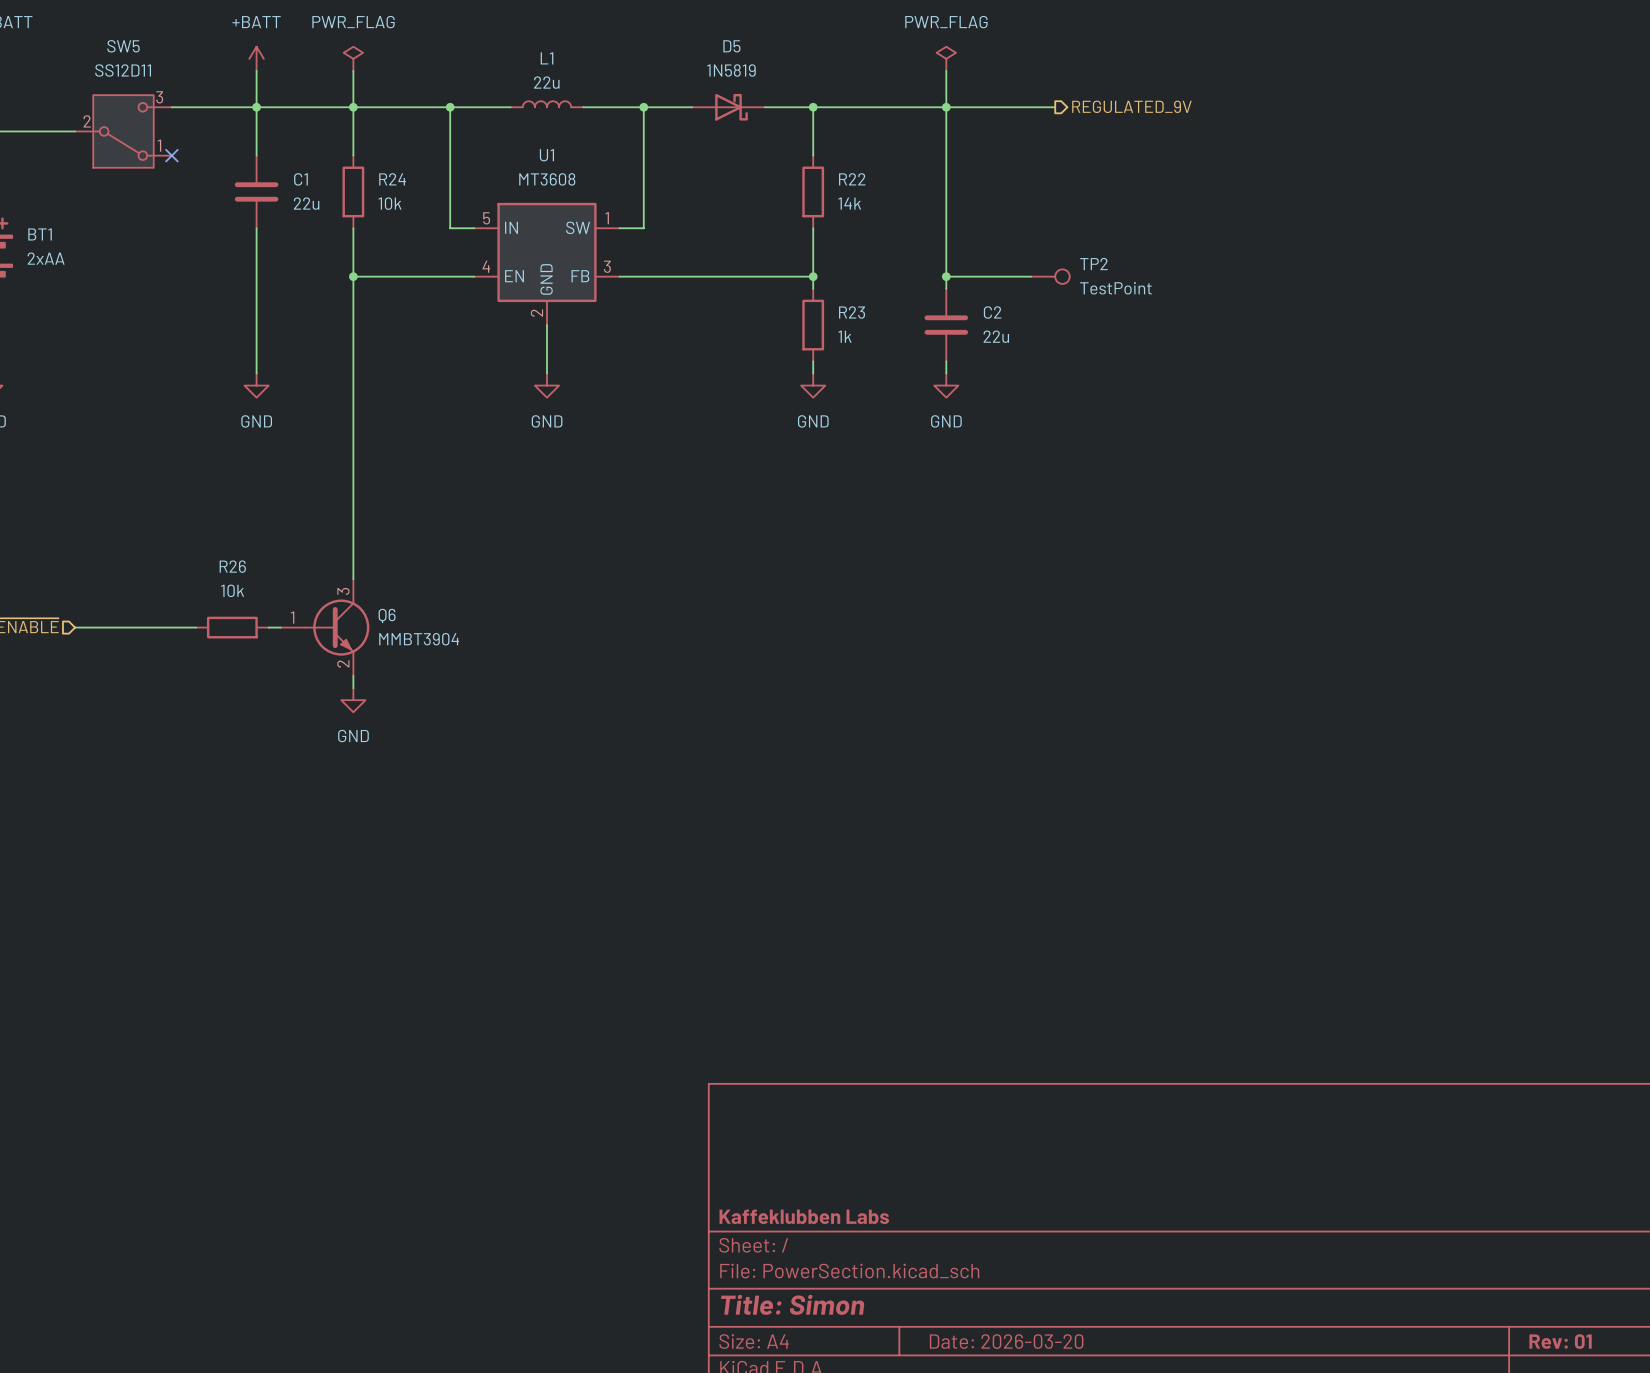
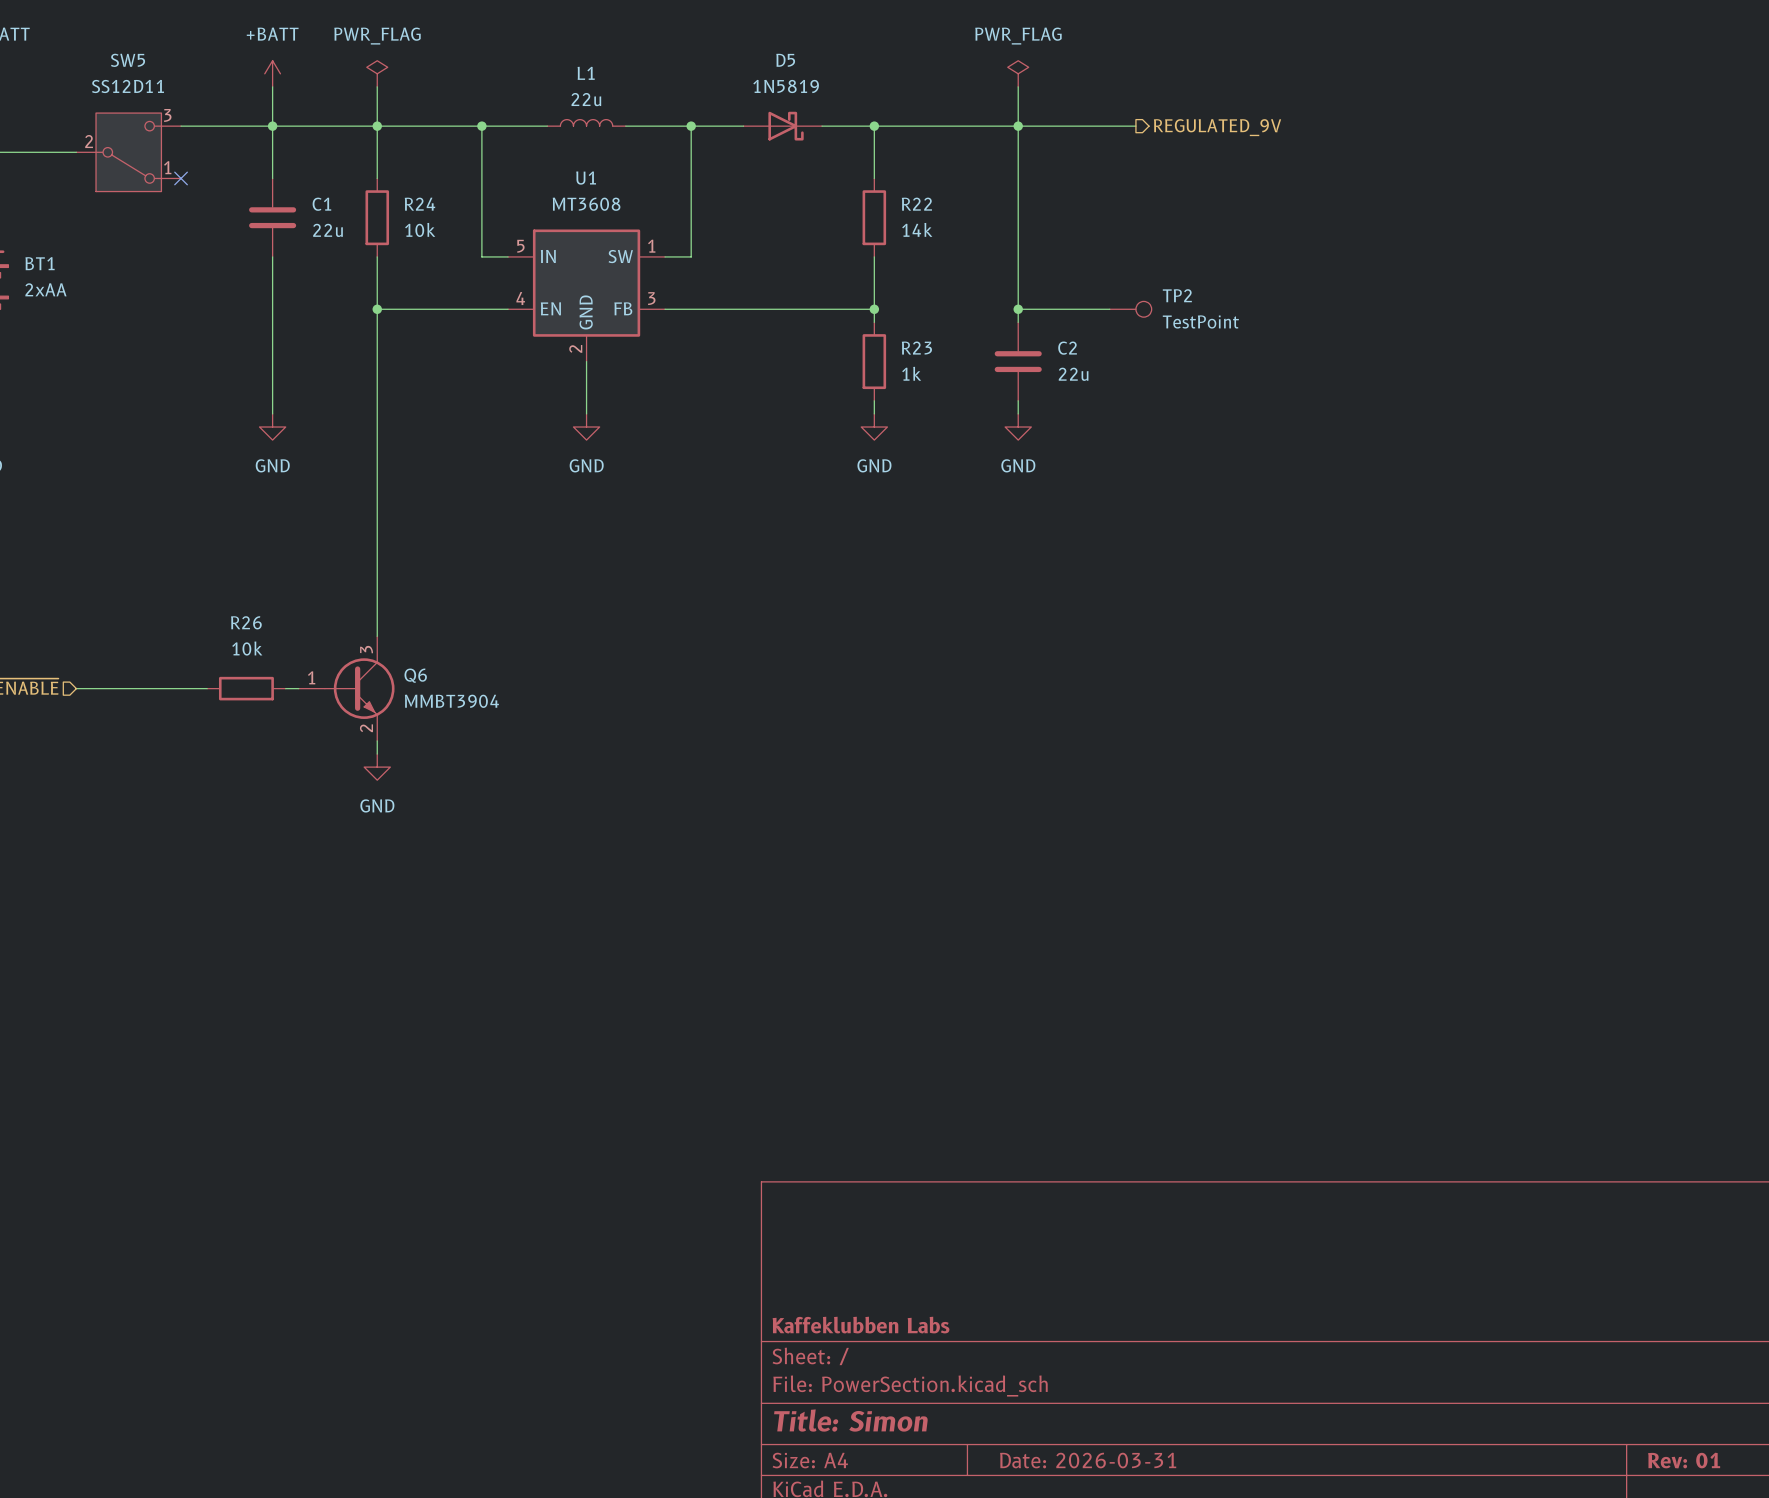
title block: Date: 2026-03-20 (1006, 1341) -> Date: 2026-03-31 (1088, 1460)

